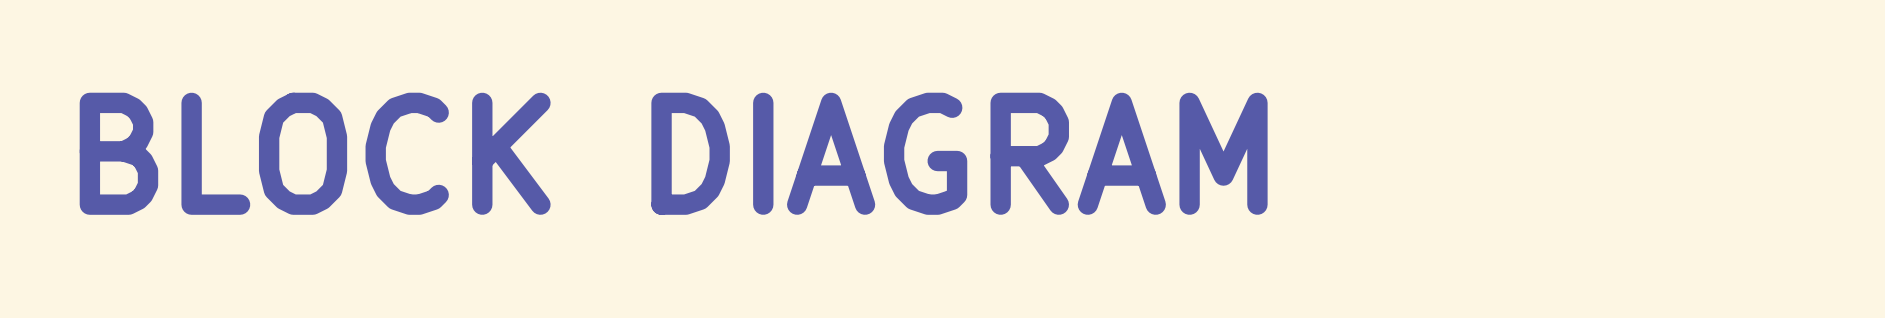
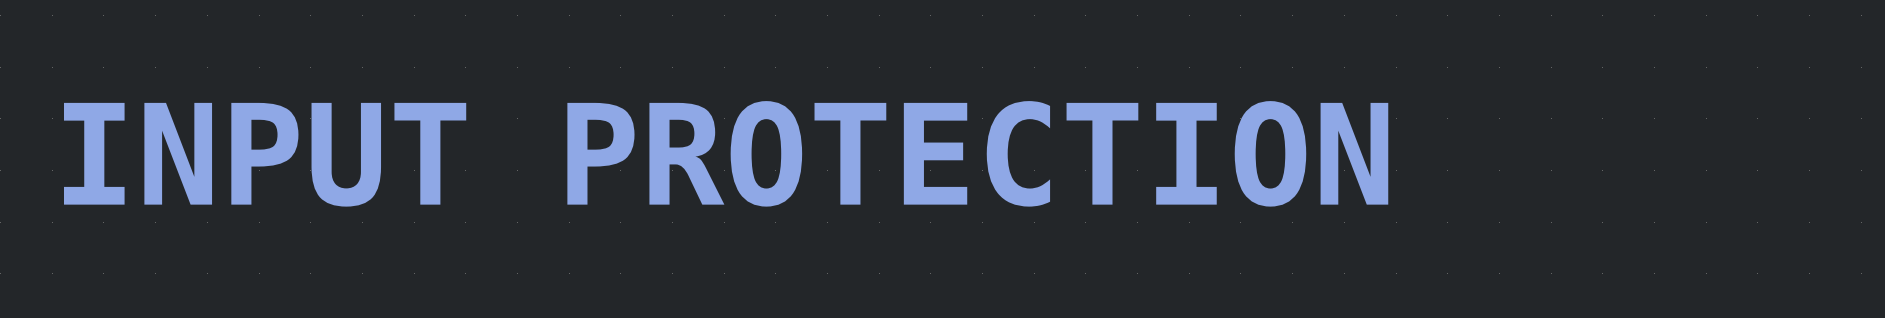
text: BLOCK DIAGRAM (673, 153) -> INPUT PROTECTION (726, 153)

